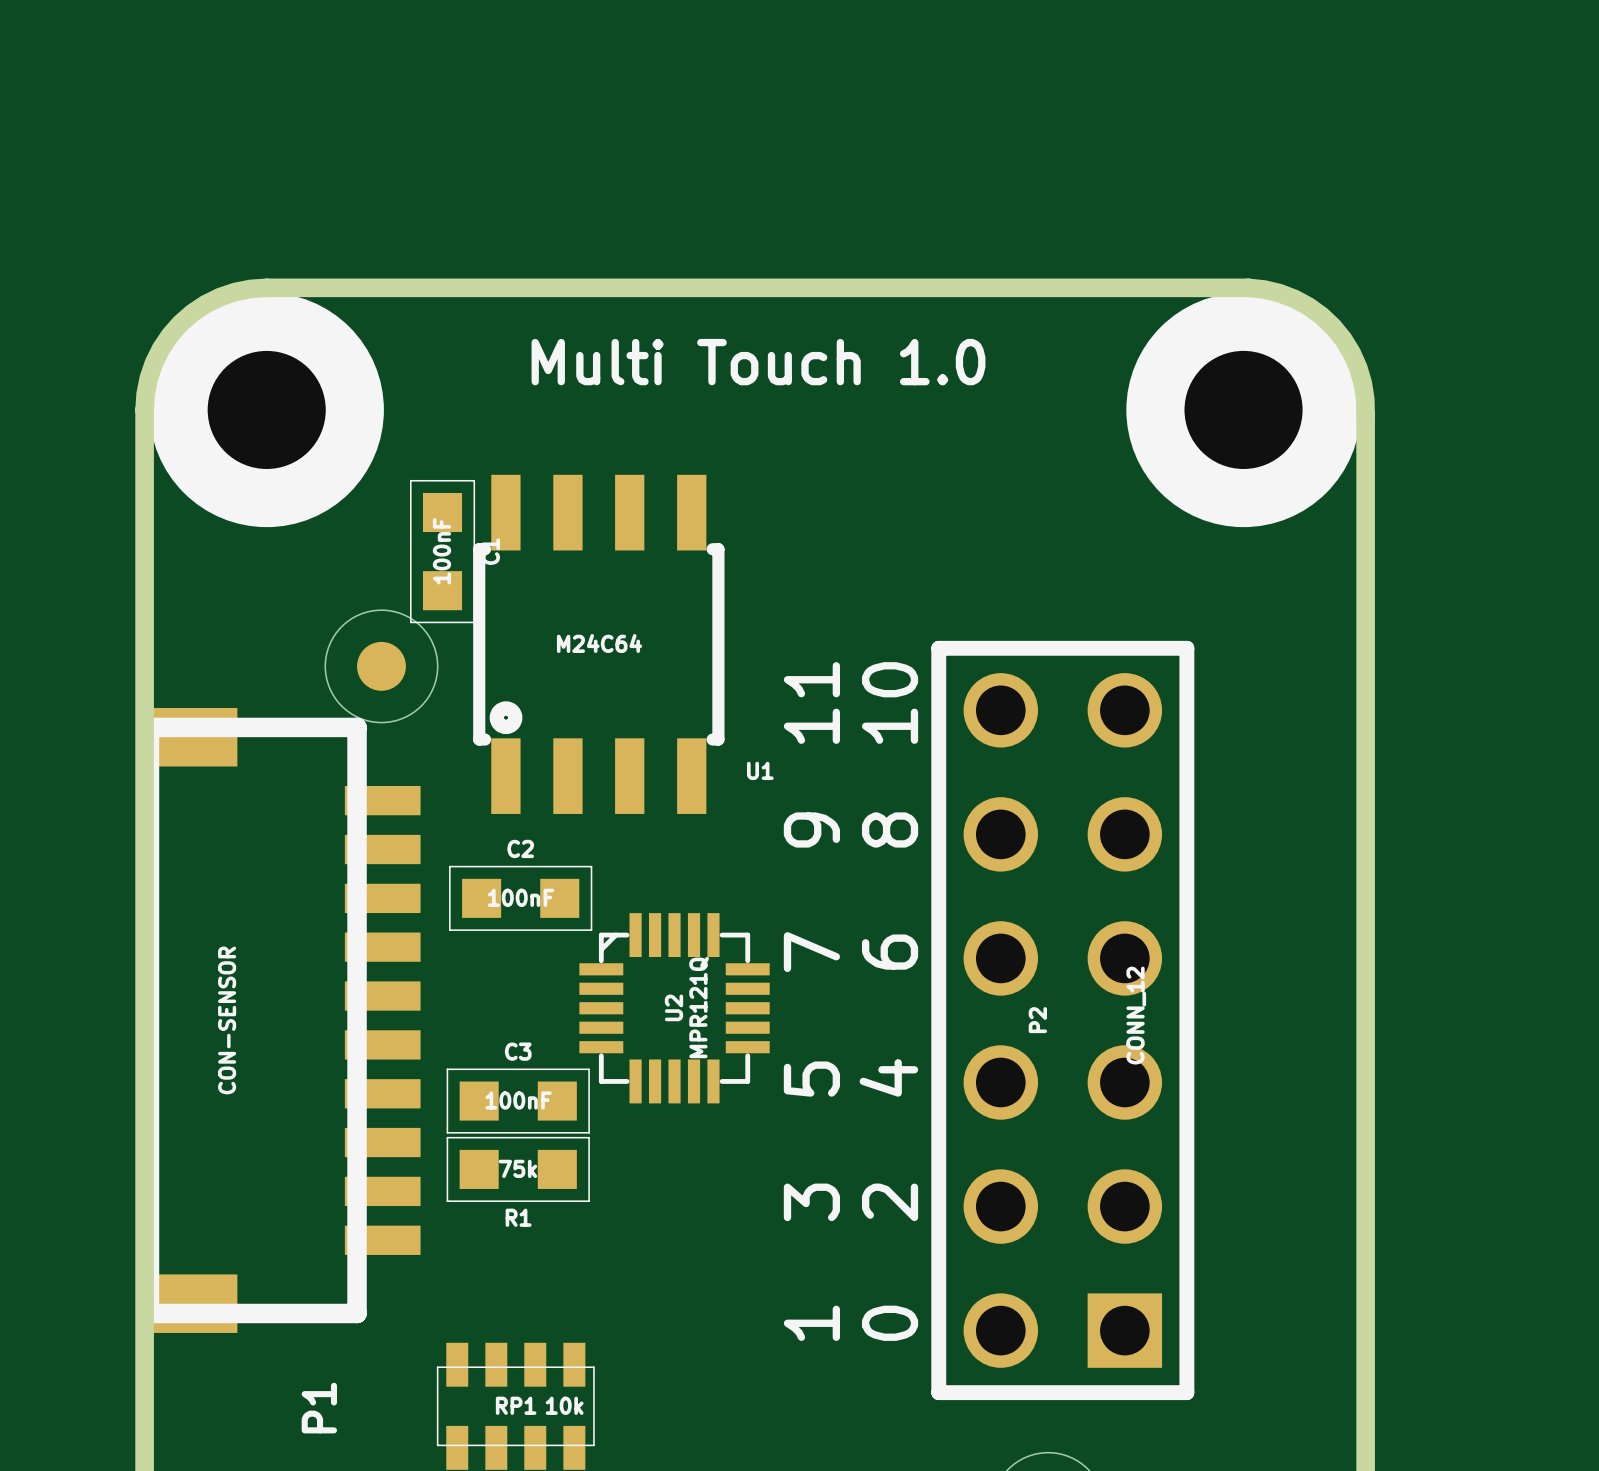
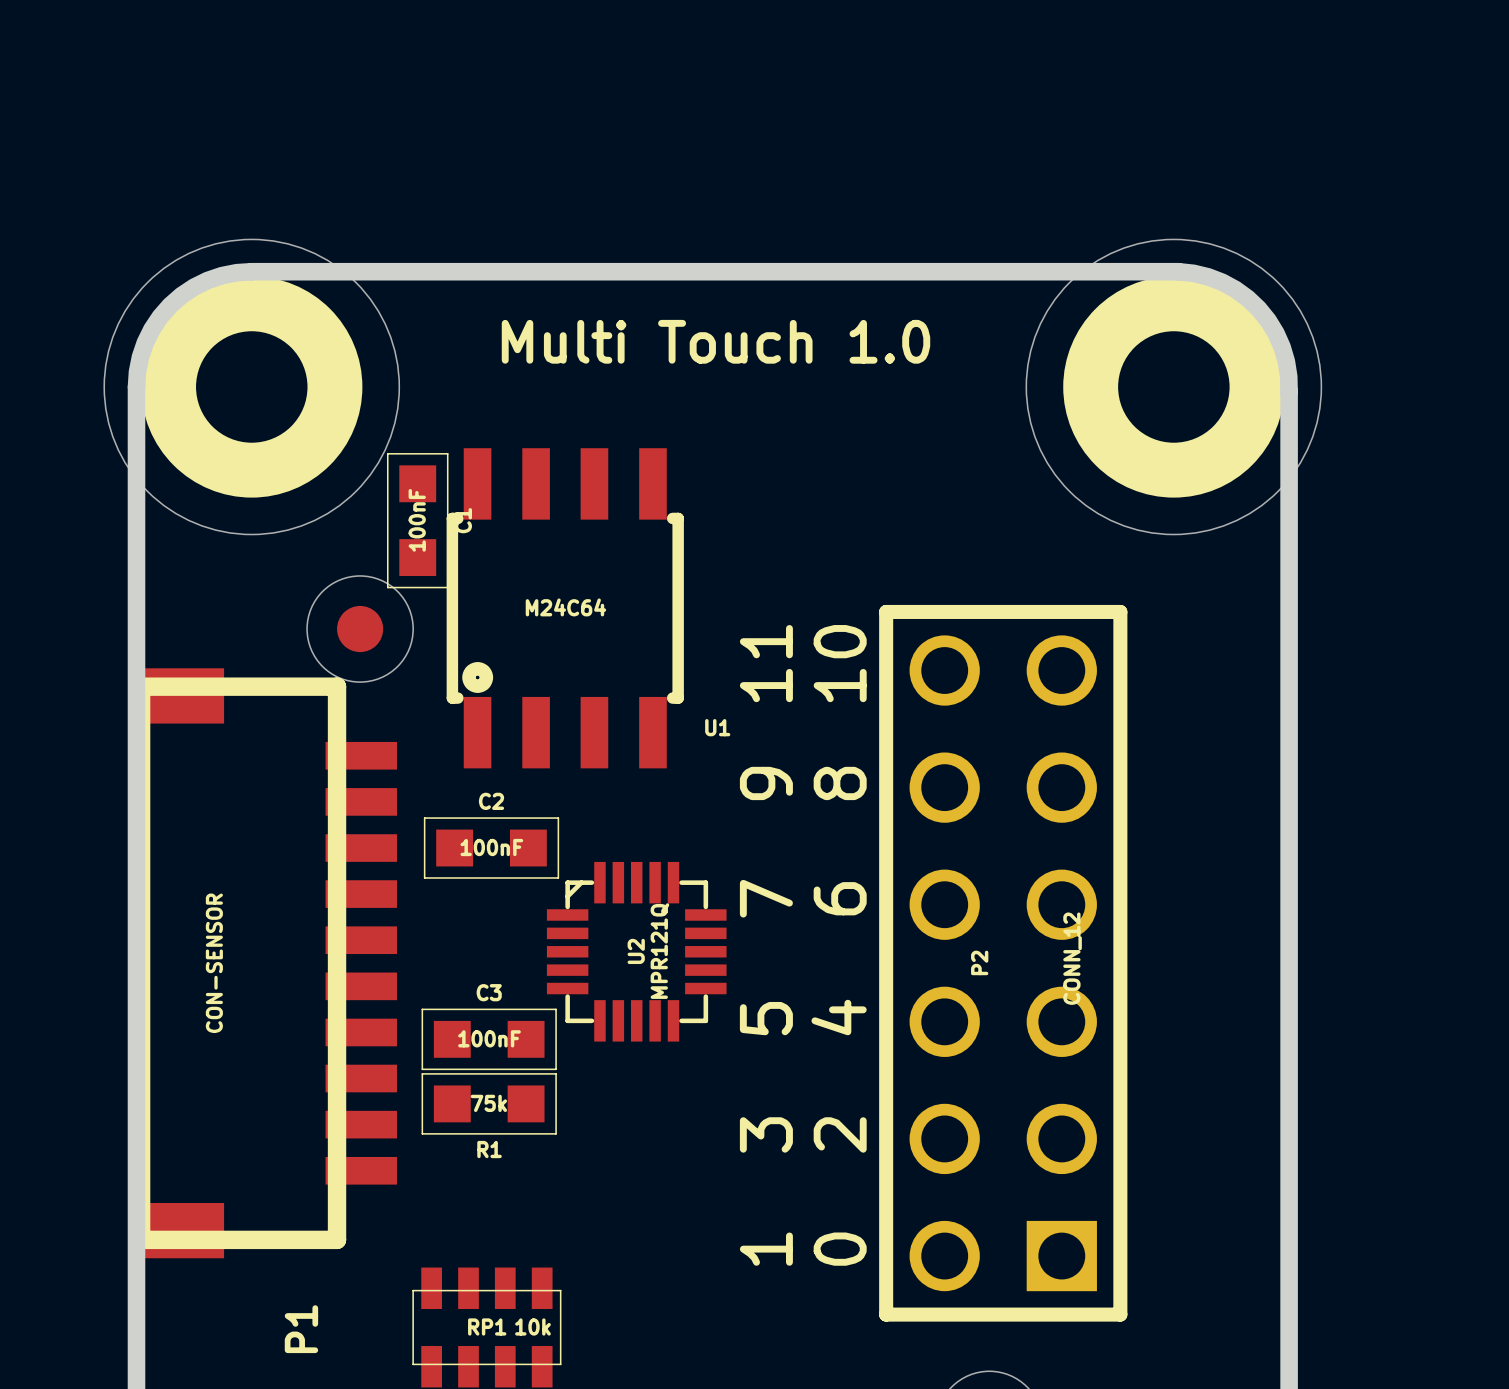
part footprint: [149, 292, 384, 528] -> [104, 239, 400, 535]
part footprint: [1126, 292, 1361, 528] -> [1026, 239, 1322, 535]

